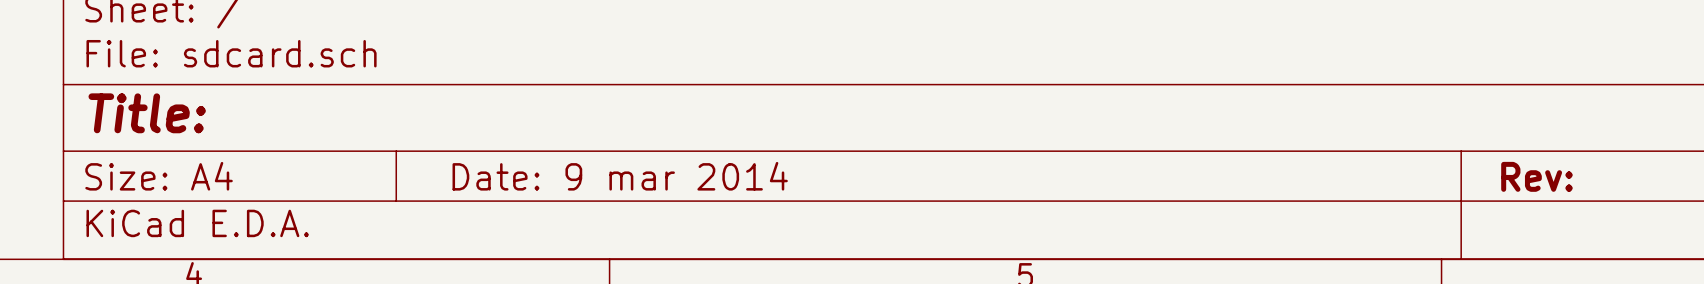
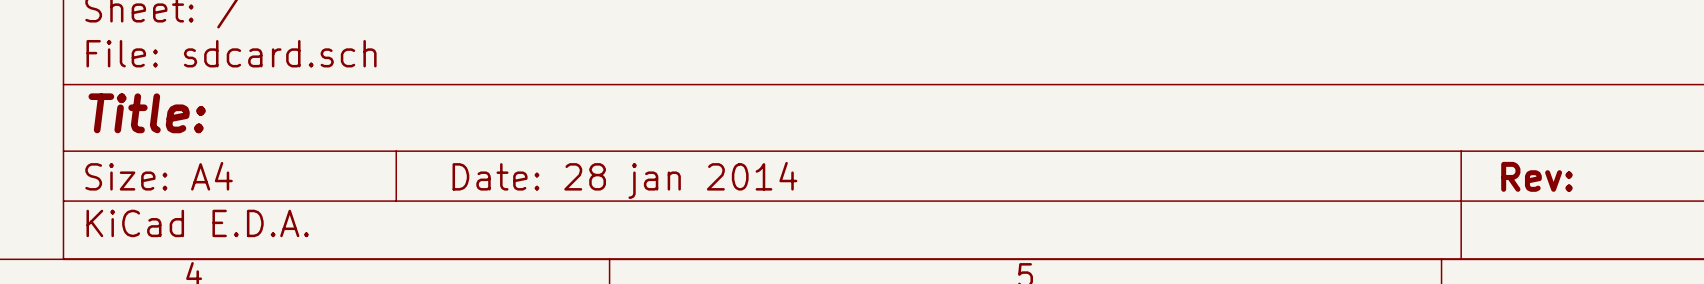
title block: Date: 9 mar 2014 (620, 176) -> Date: 28 jan 2014 (624, 180)

